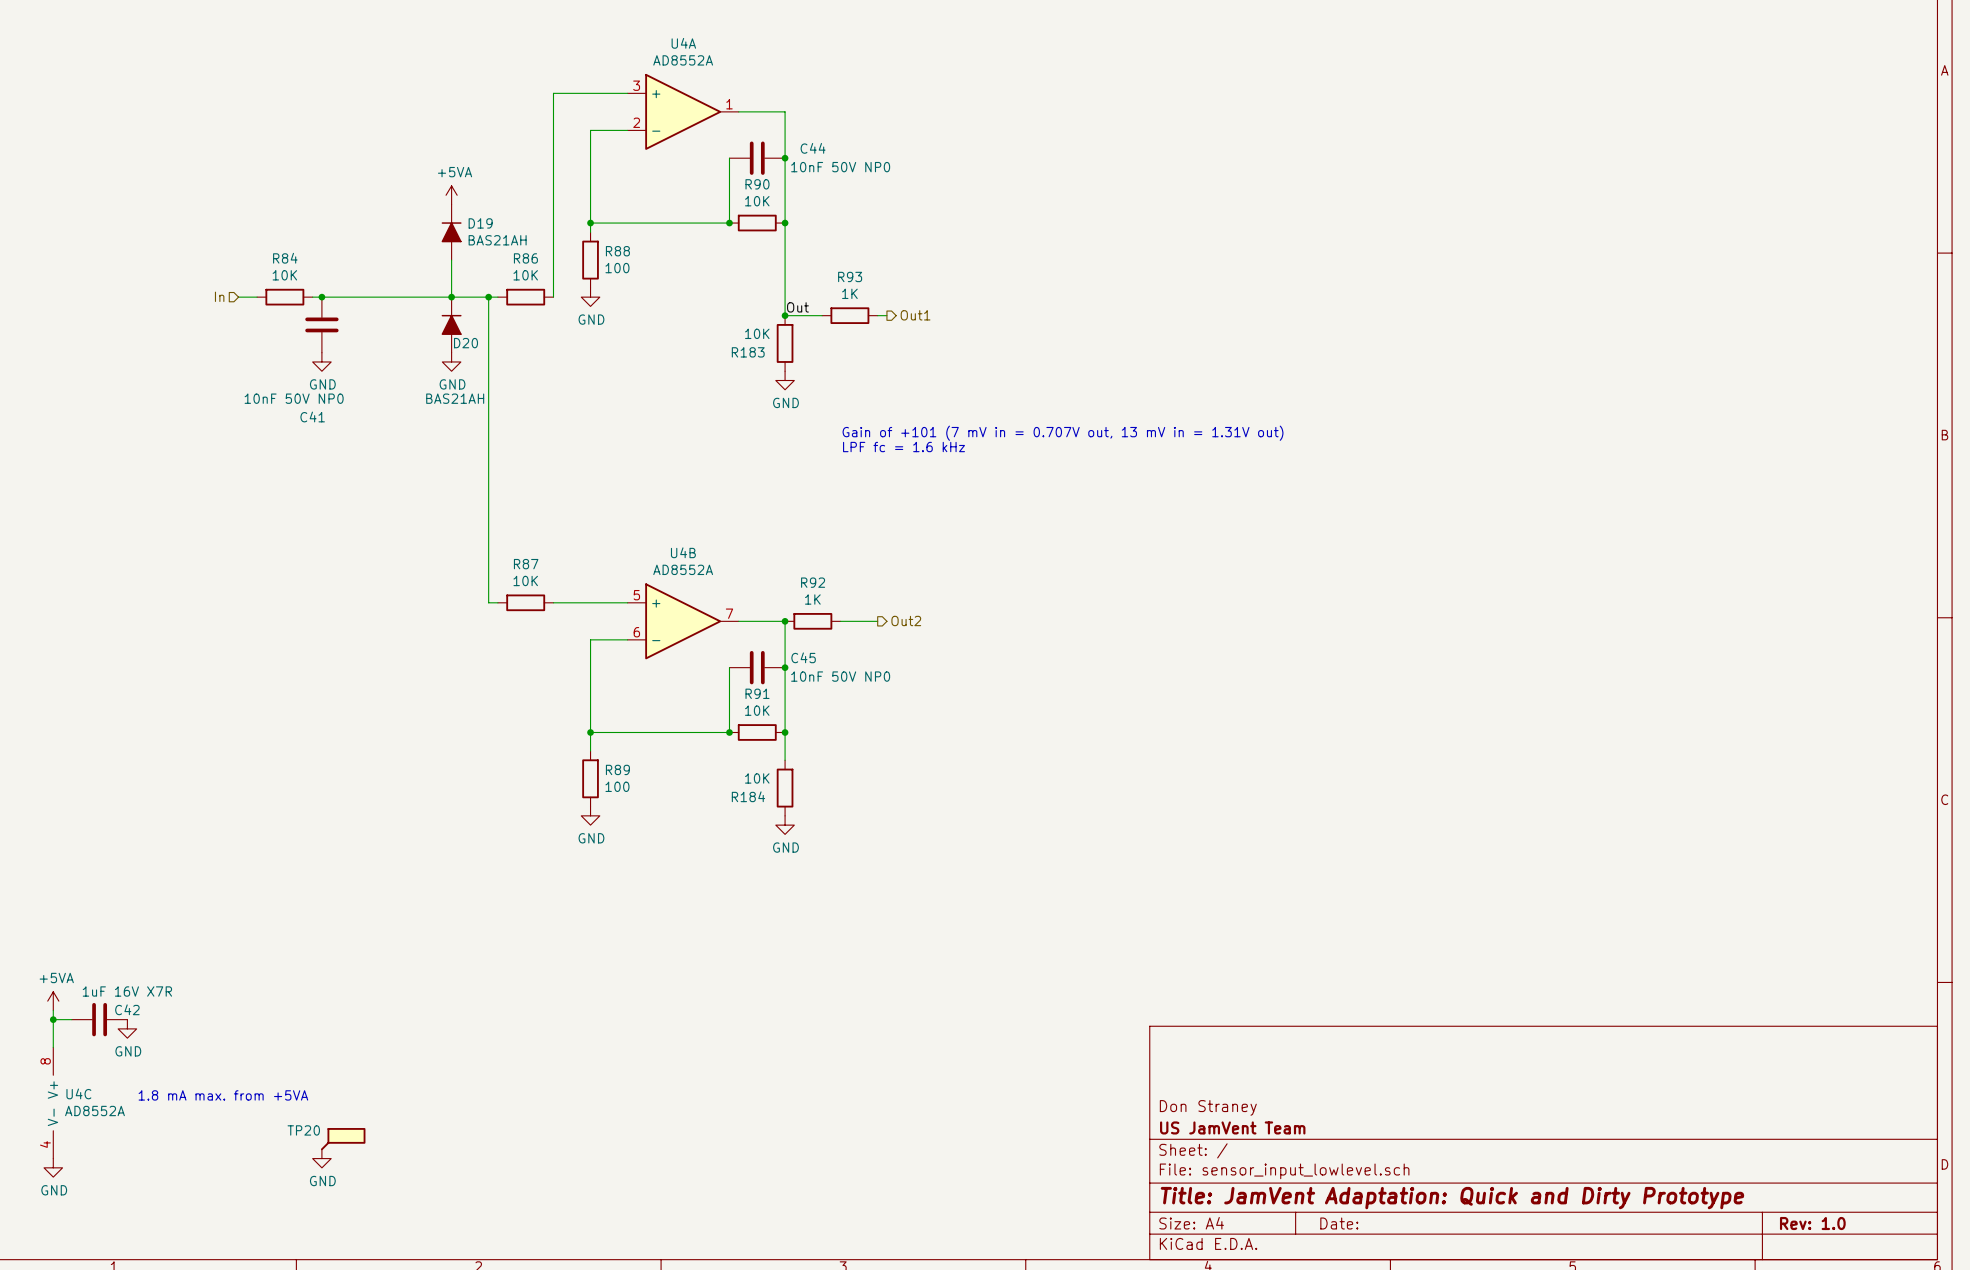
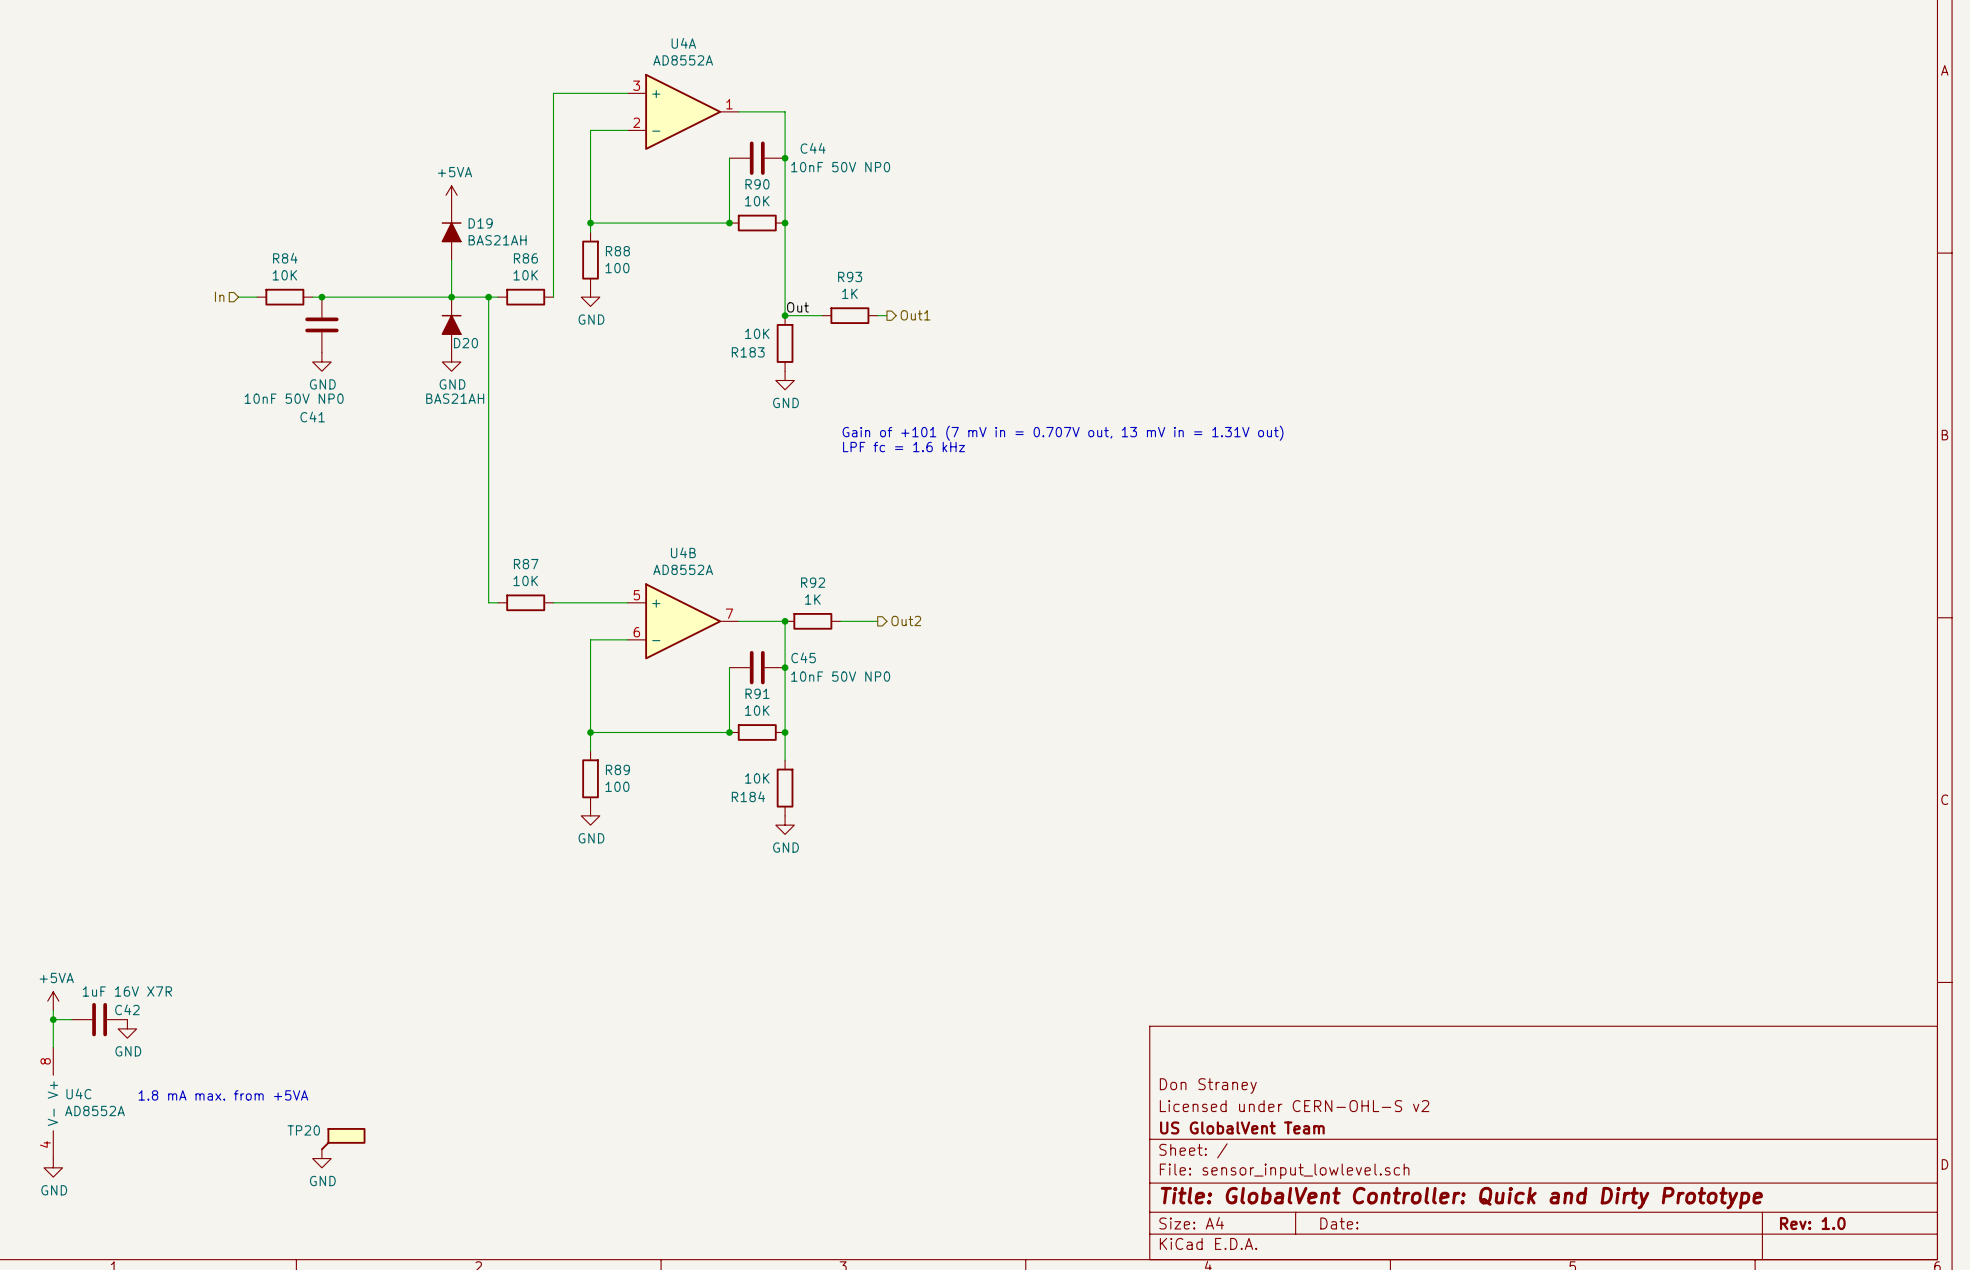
title block: none -> Don Straney (1208, 1086)
title block: Don Straney (1208, 1107) -> Licensed under CERN-OHL-S v2 (1294, 1106)
title block: US JamVent Team (1232, 1127) -> US GlobalVent Team (1242, 1127)
title block: Title: JamVent Adaptation: Quick and Dirty Prototype (1452, 1198) -> Title: GlobalVent Controller: Quick and Dirty Prototype (1461, 1198)

